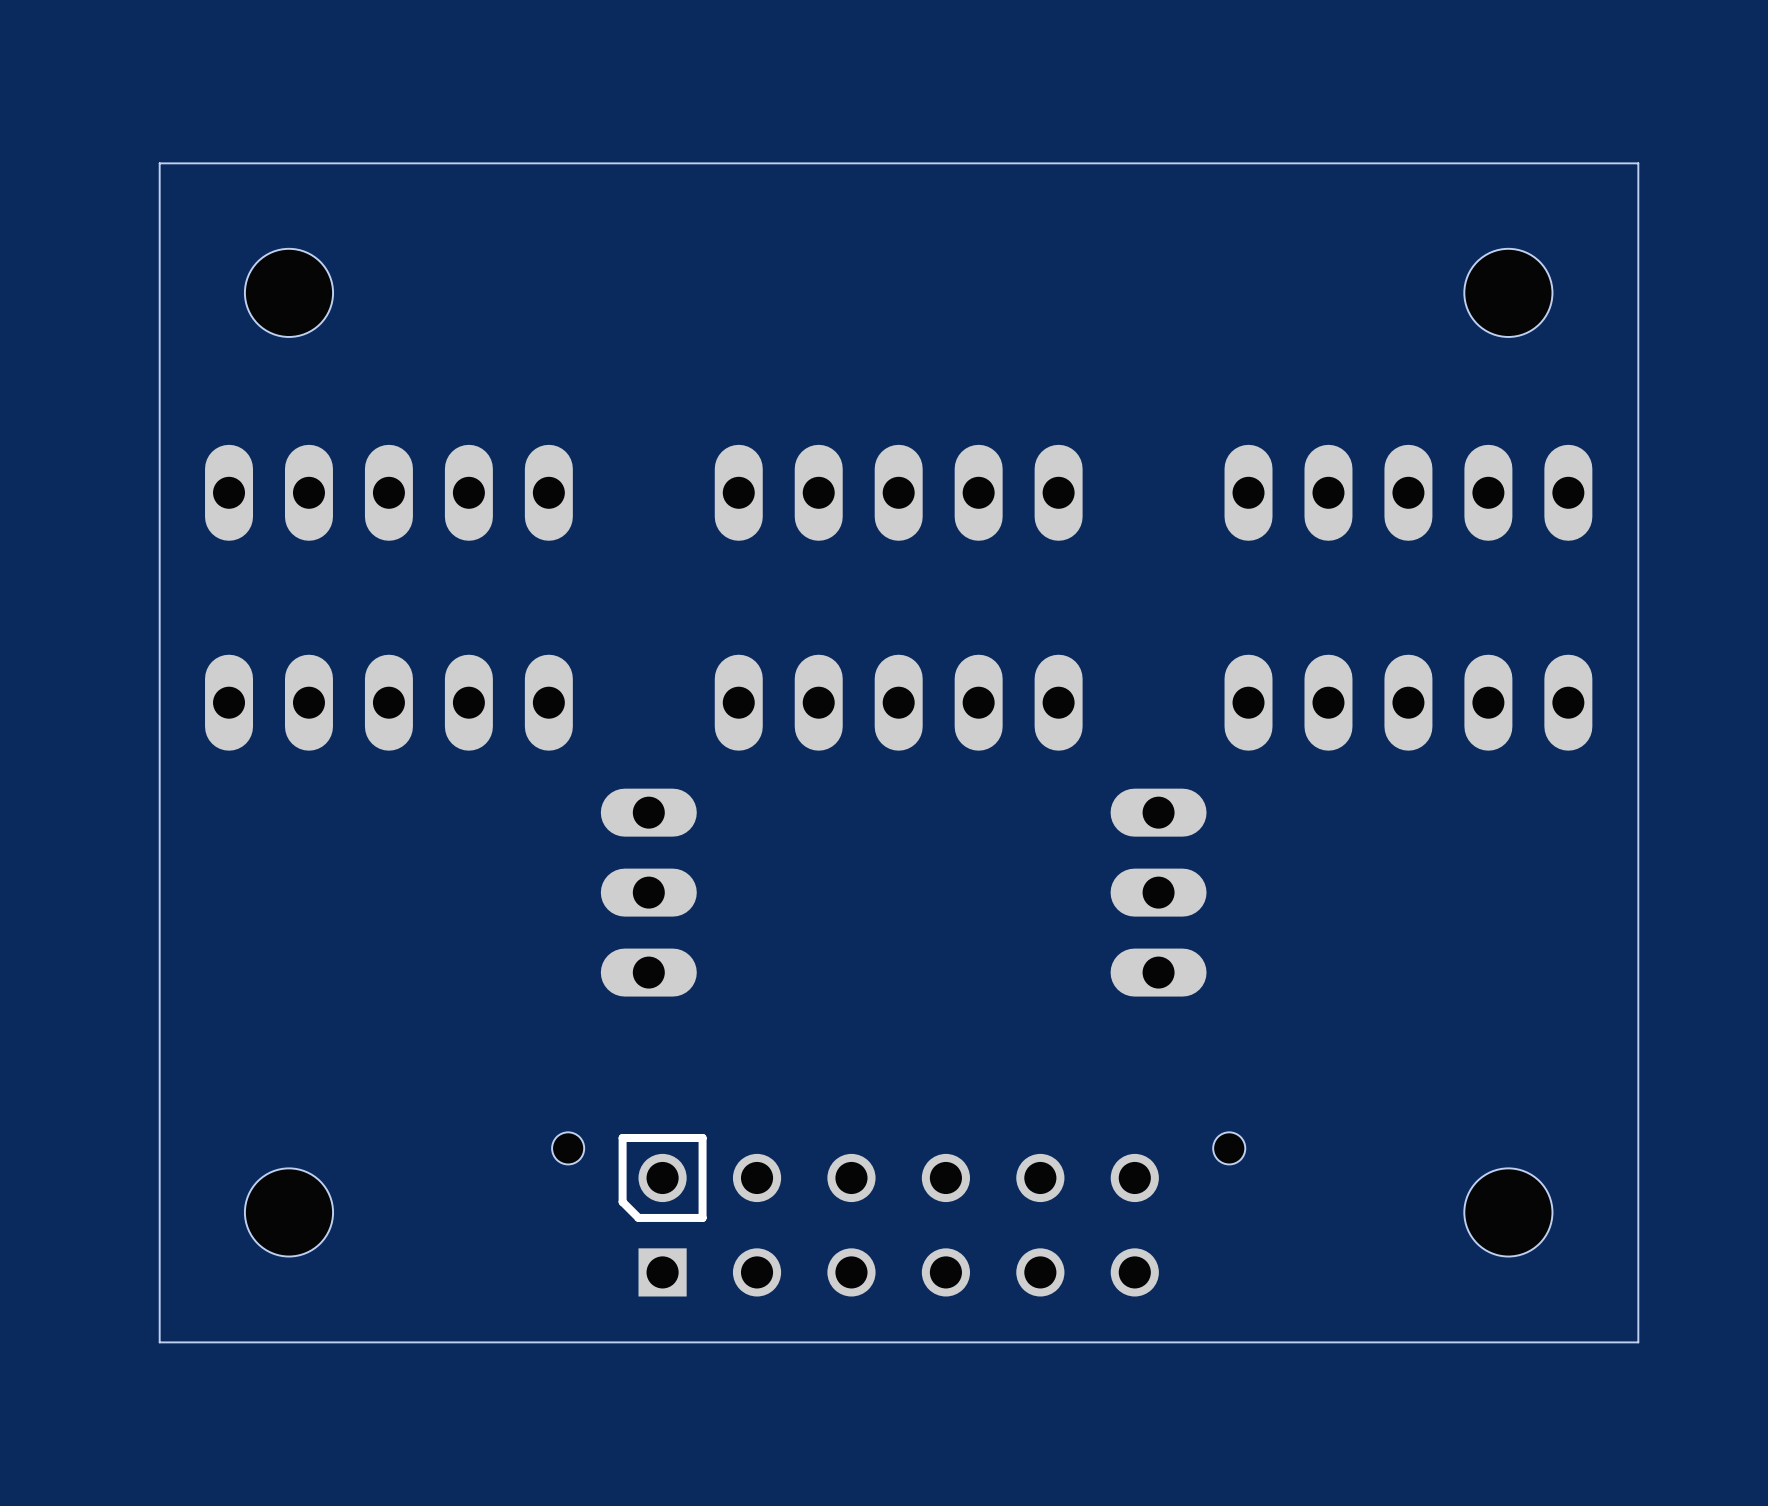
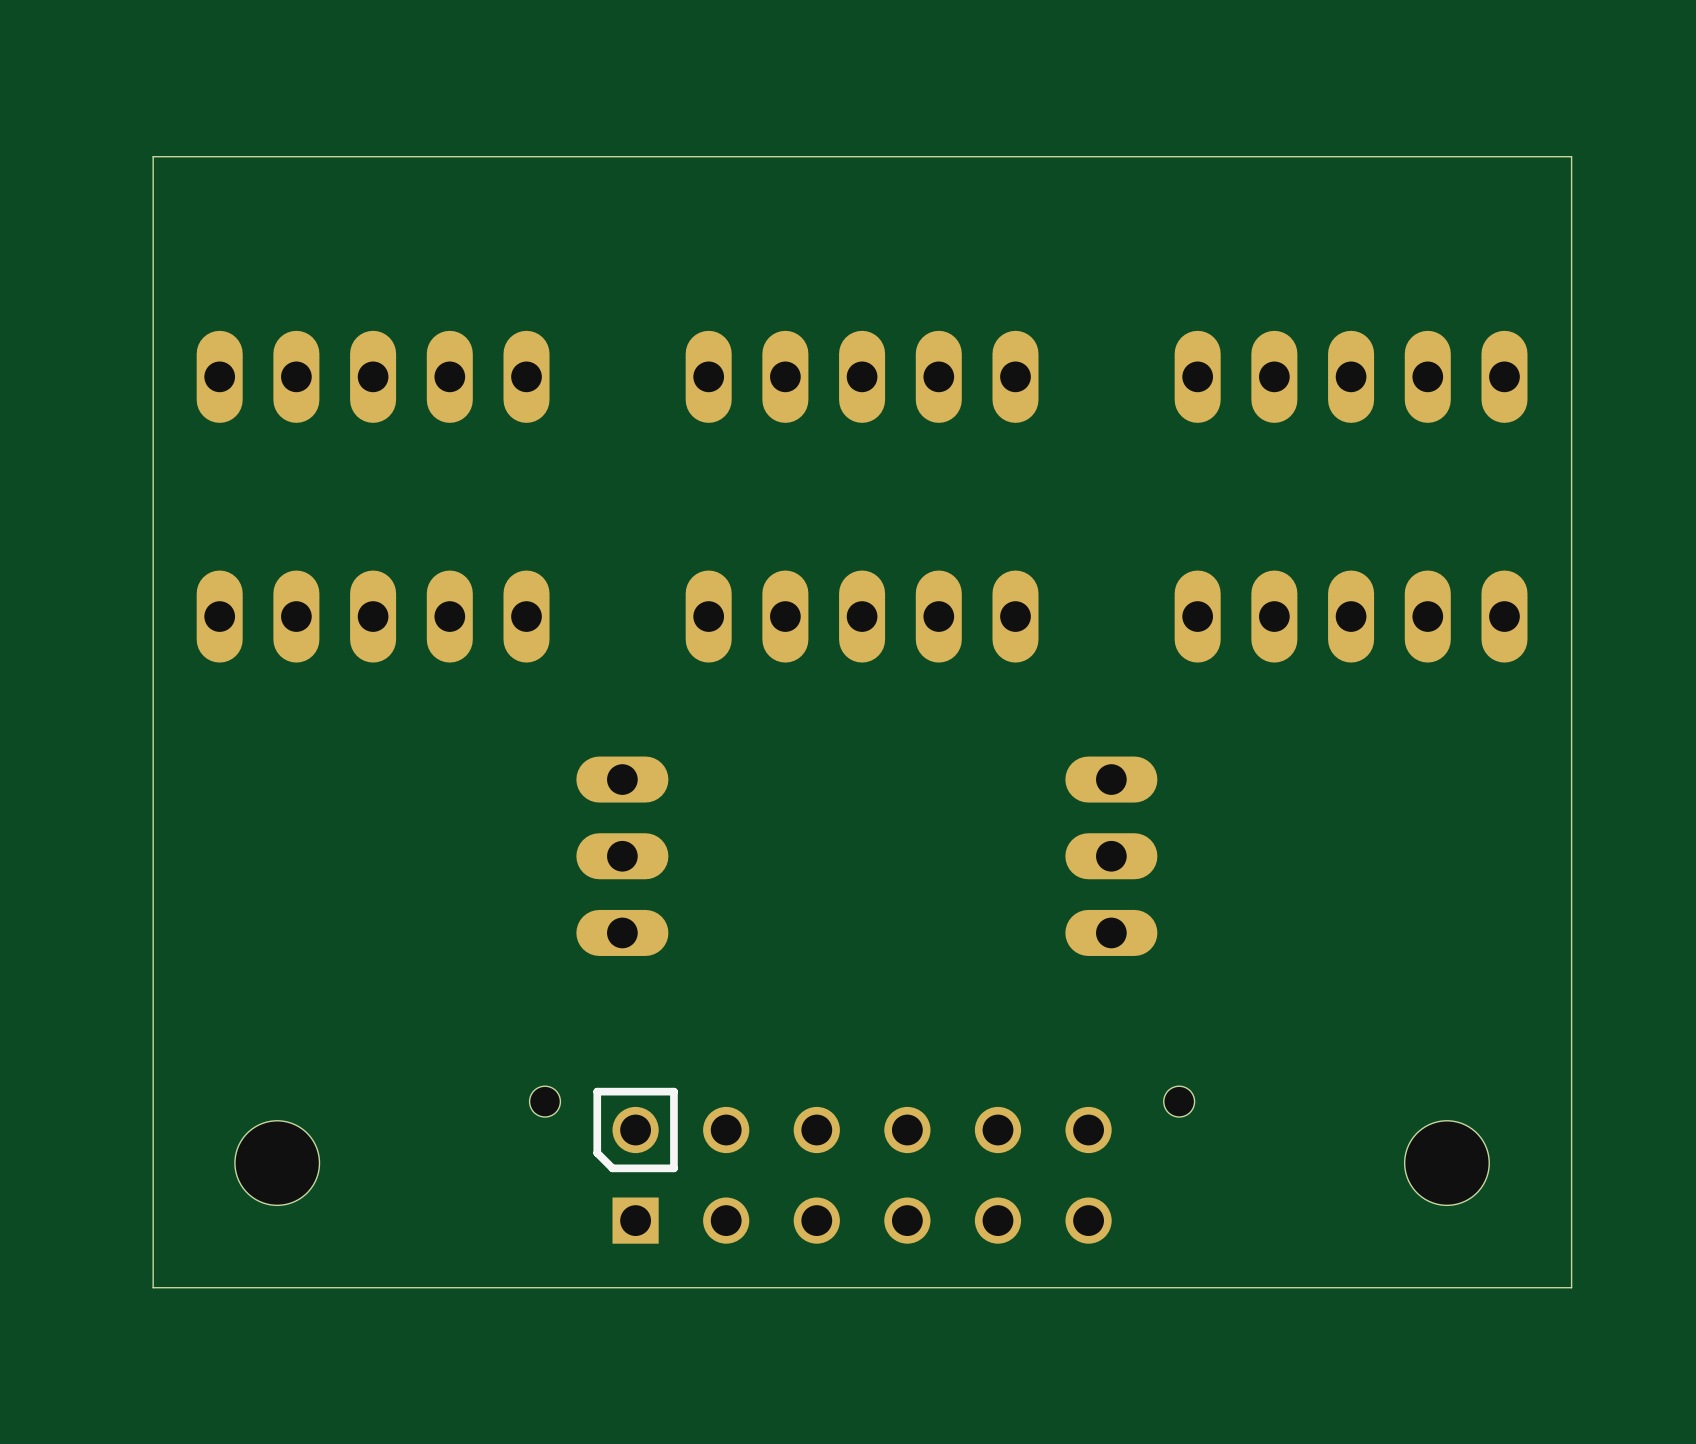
part: (288, 292) -> none
part: (1508, 292) -> none
part: none -> (373, 376)
part: none -> (862, 376)
part: none -> (1351, 376)
part: (388, 492) -> none
part: (898, 492) -> none
part: (1408, 492) -> none
part position: (388, 702) -> (373, 616)
part position: (898, 702) -> (862, 616)
part position: (1408, 702) -> (1351, 616)

